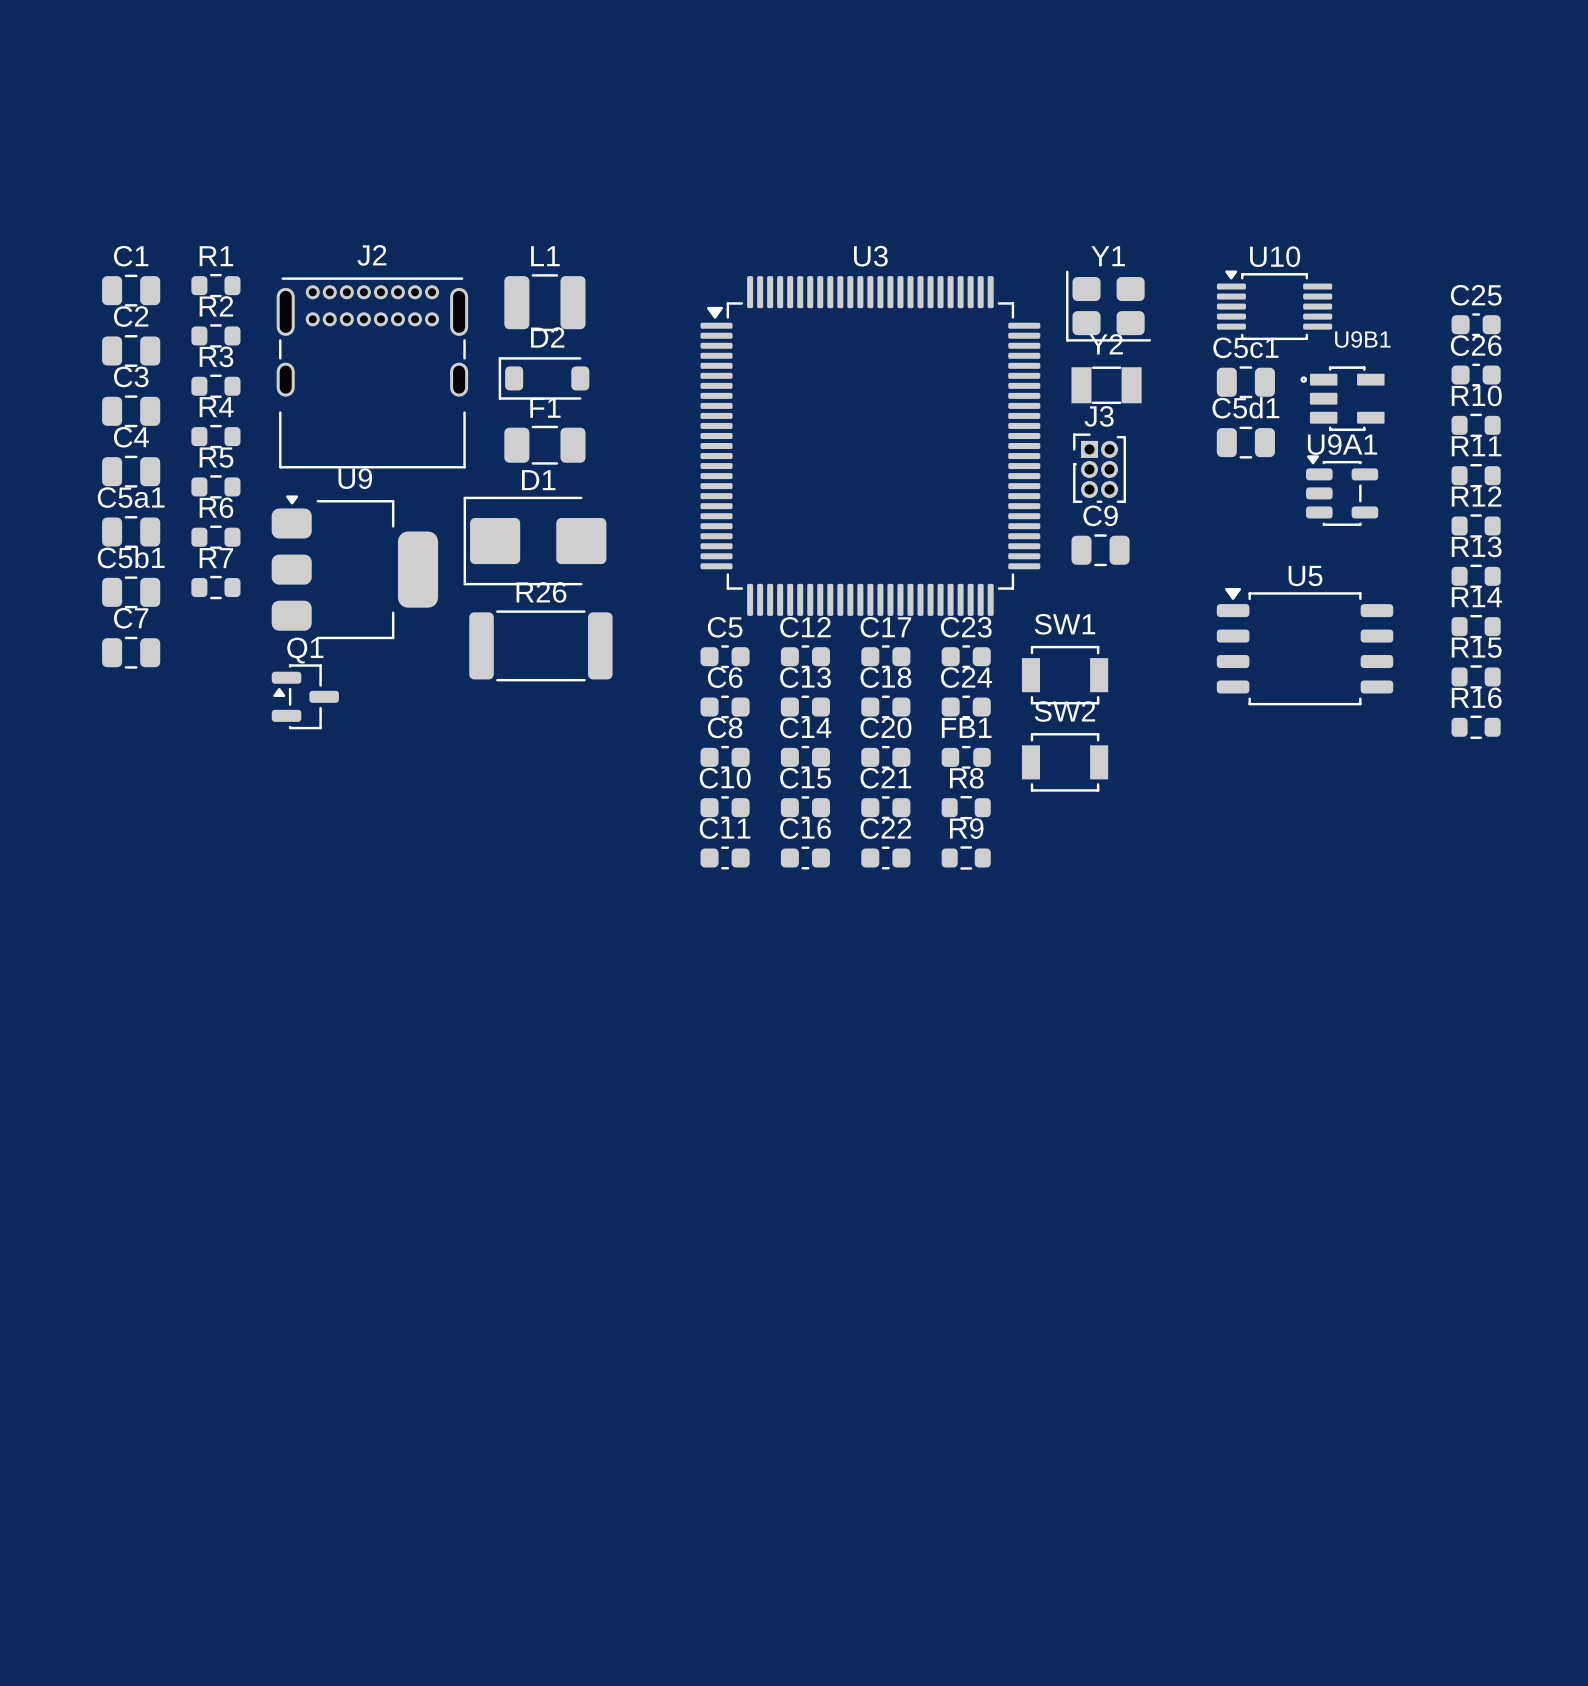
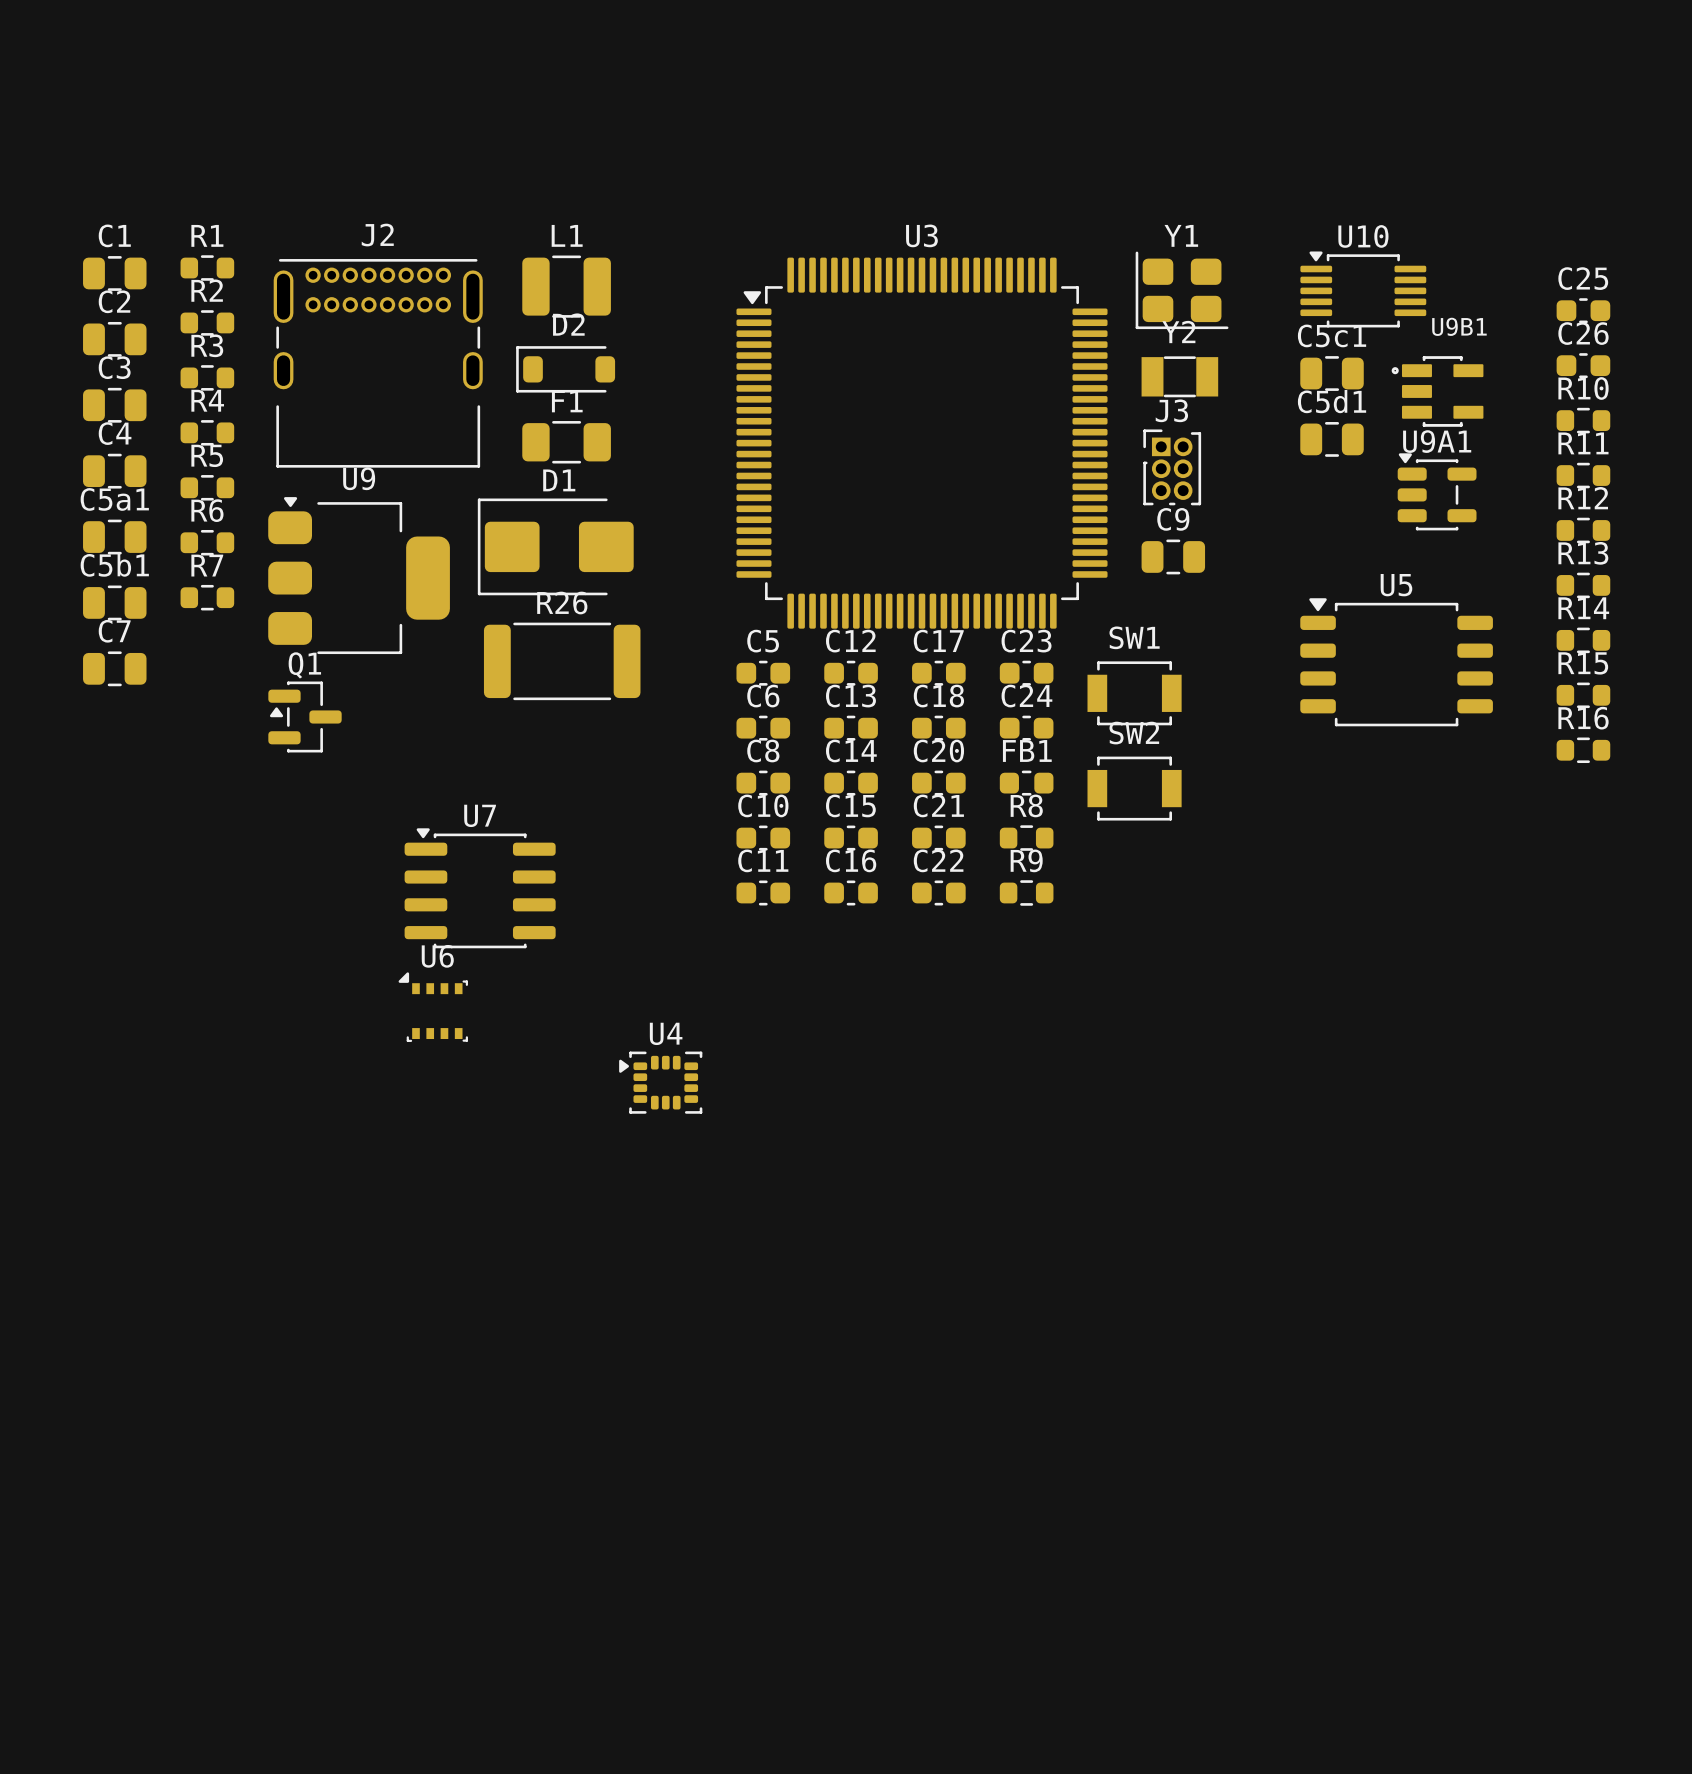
U7: none -> (480, 888)
U6: none -> (433, 1007)
U4: none -> (660, 1082)

